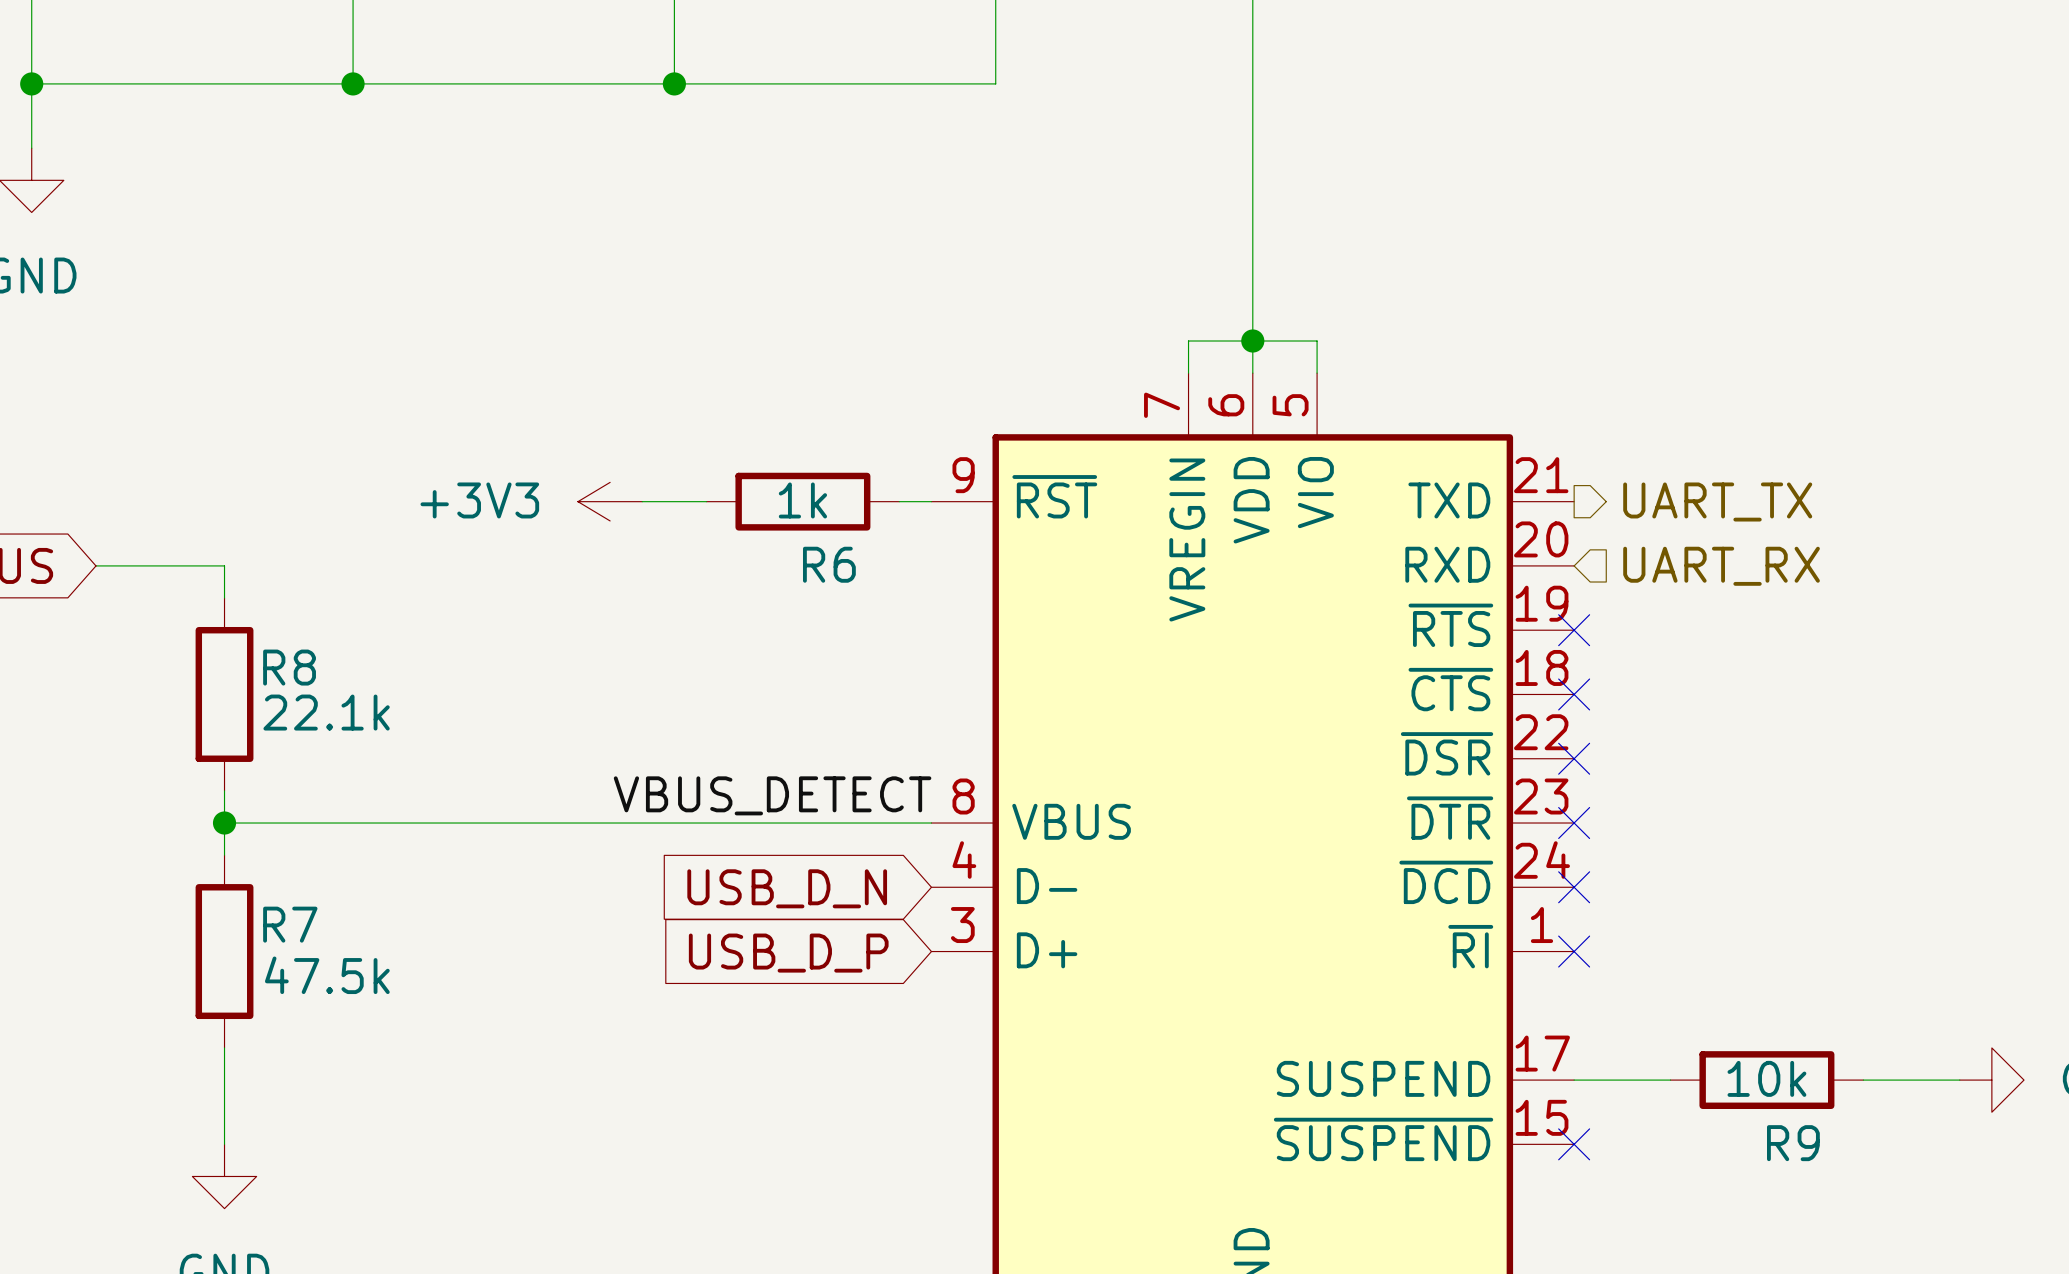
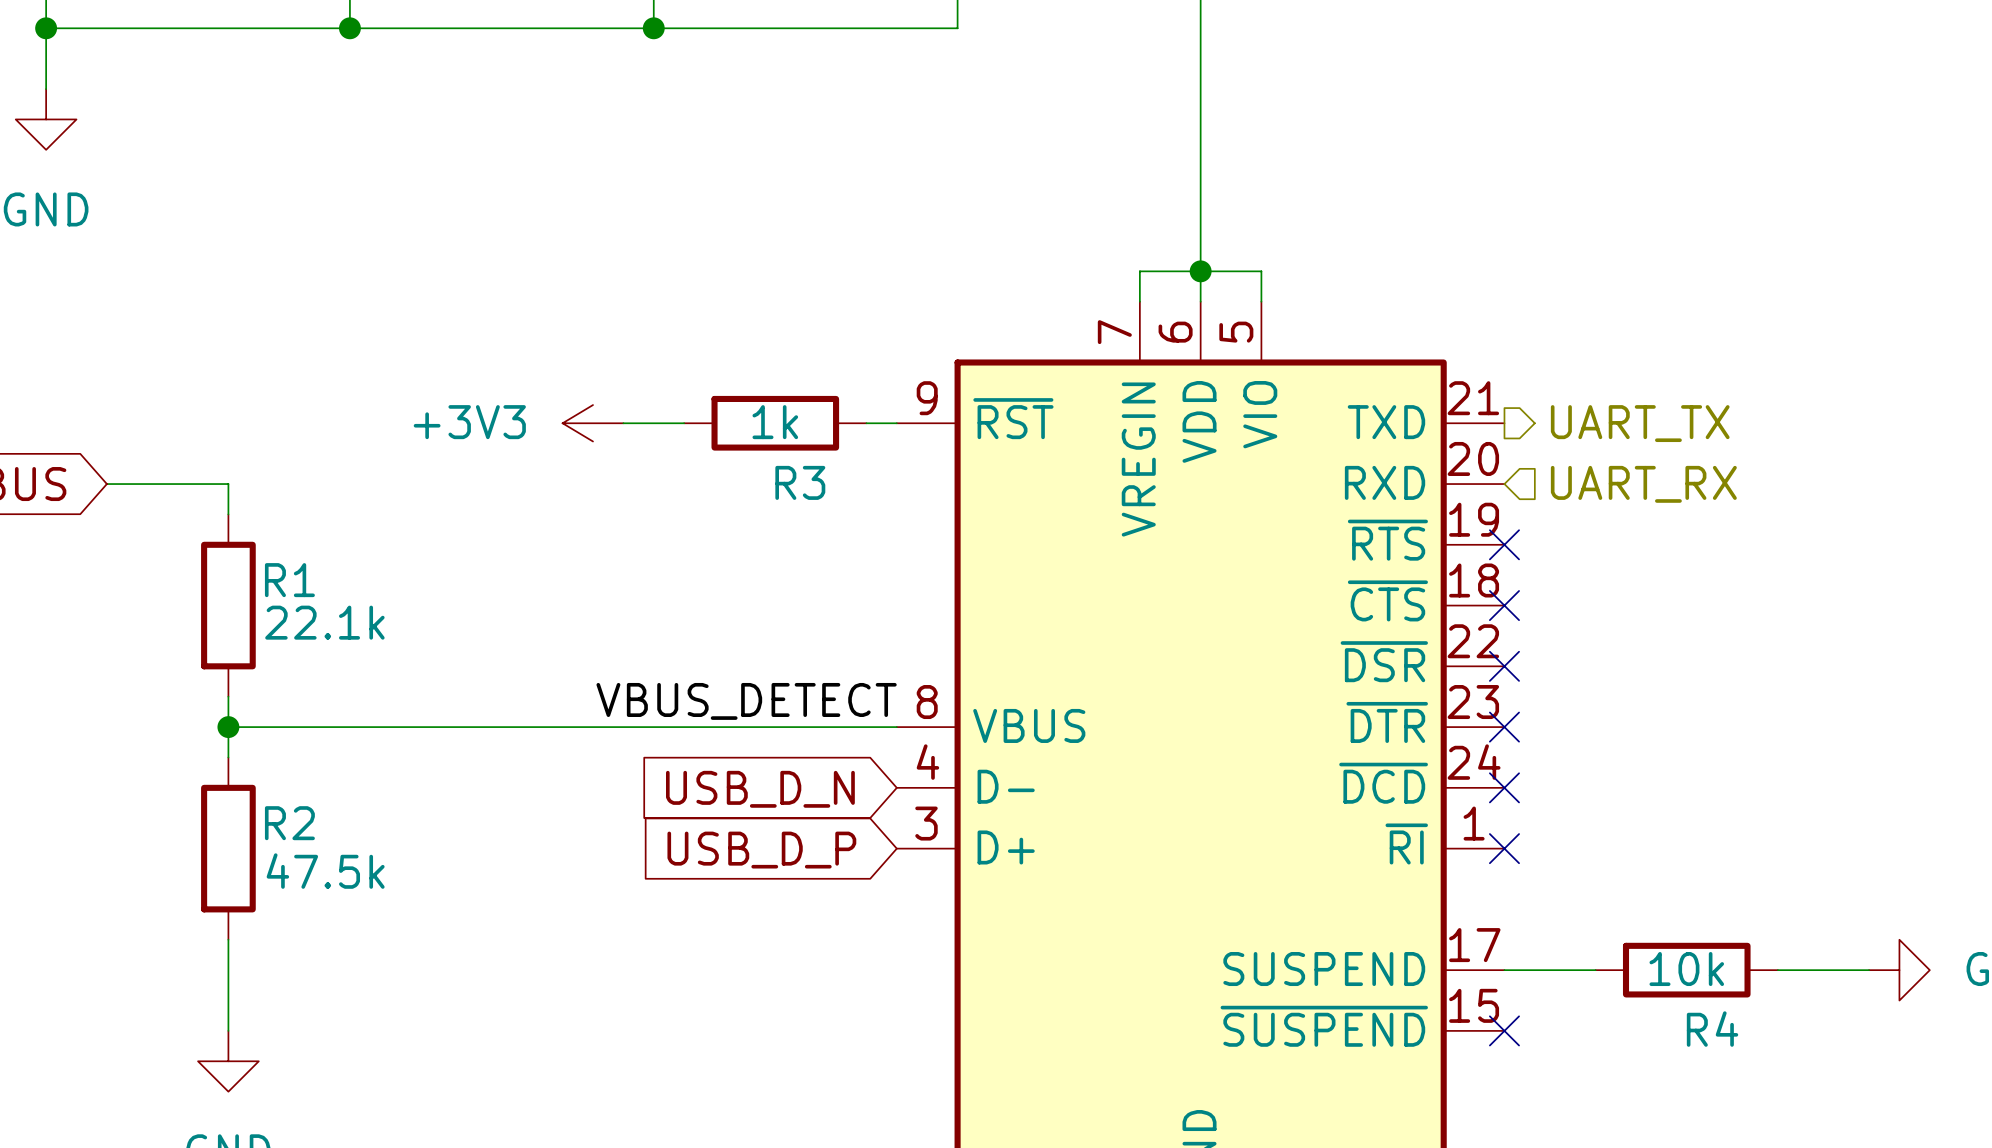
R6 name: R6 (829, 564) -> R3 (800, 482)
R8 name: R8 (289, 667) -> R1 (289, 580)
R7 name: R7 (290, 924) -> R2 (289, 823)
R9 name: R9 (1793, 1143) -> R4 (1712, 1029)

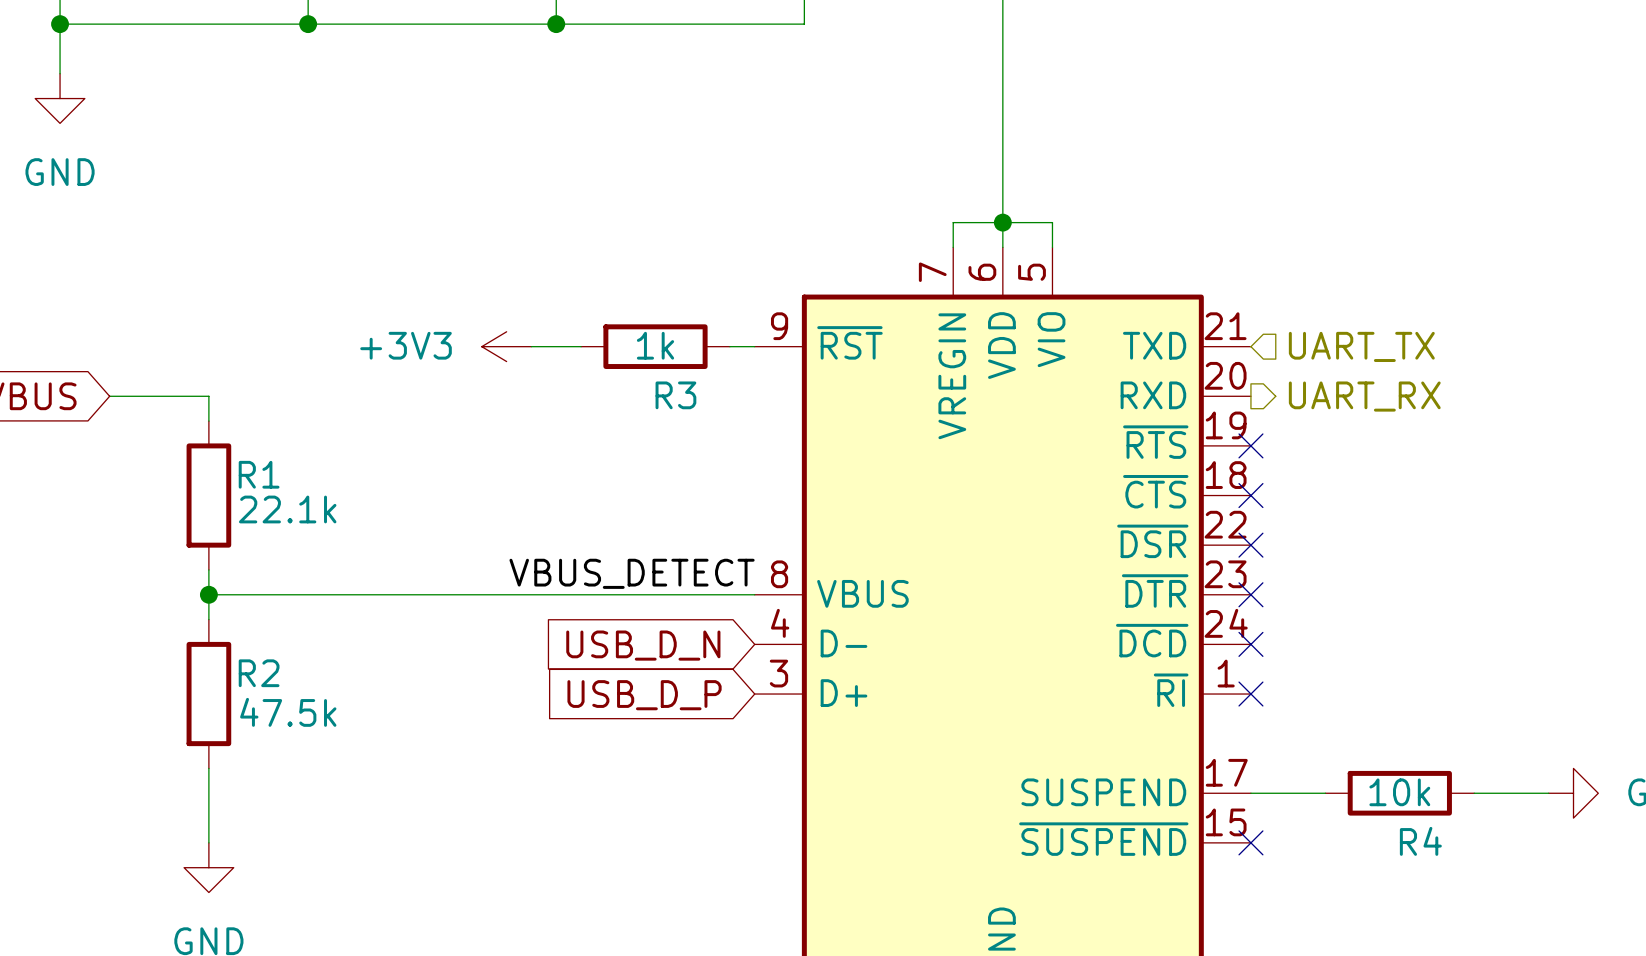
hierarchical label shape: output (1640, 423) -> input (1361, 346)
hierarchical label shape: input (1643, 484) -> output (1364, 396)

